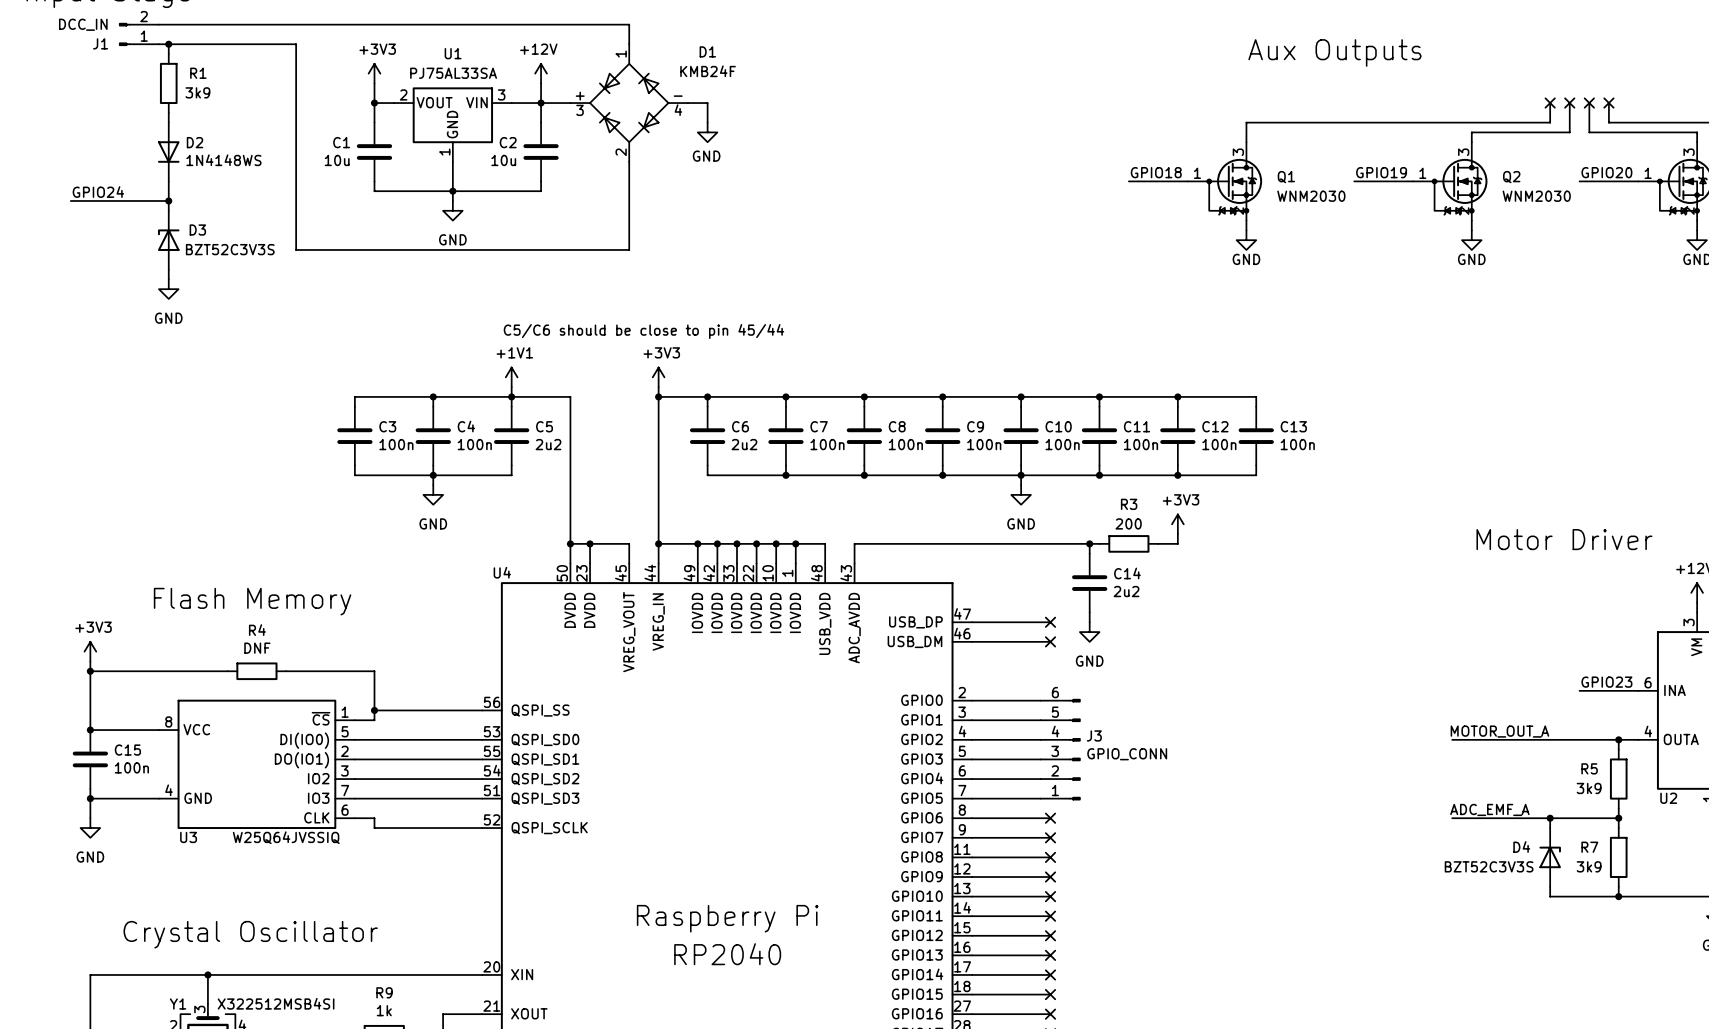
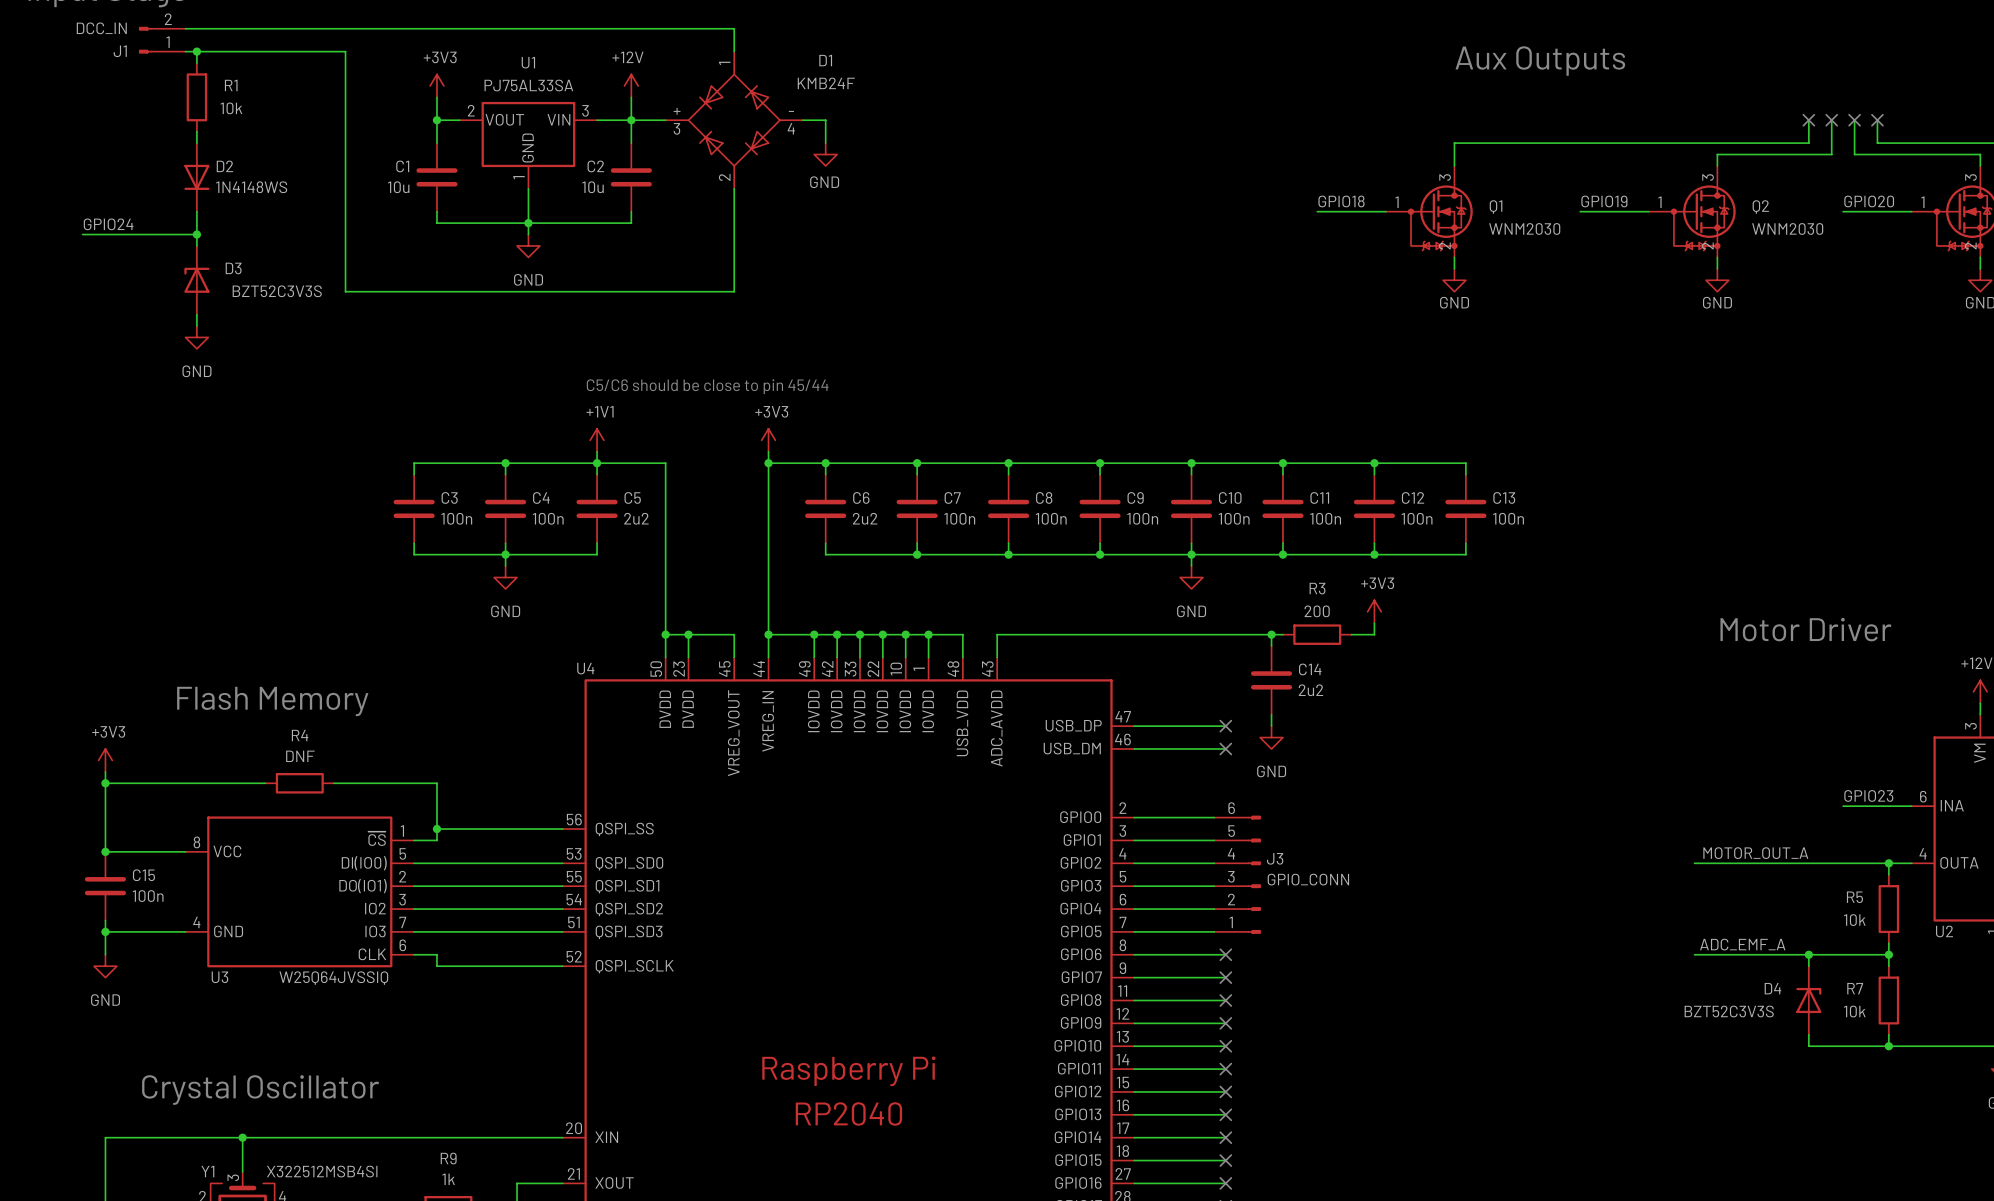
R1 value: 3k9 (197, 92) -> 10k (231, 108)
R5 value: 3k9 (1589, 788) -> 10k (1854, 920)
R7 value: 3k9 (1589, 866) -> 10k (1854, 1011)

